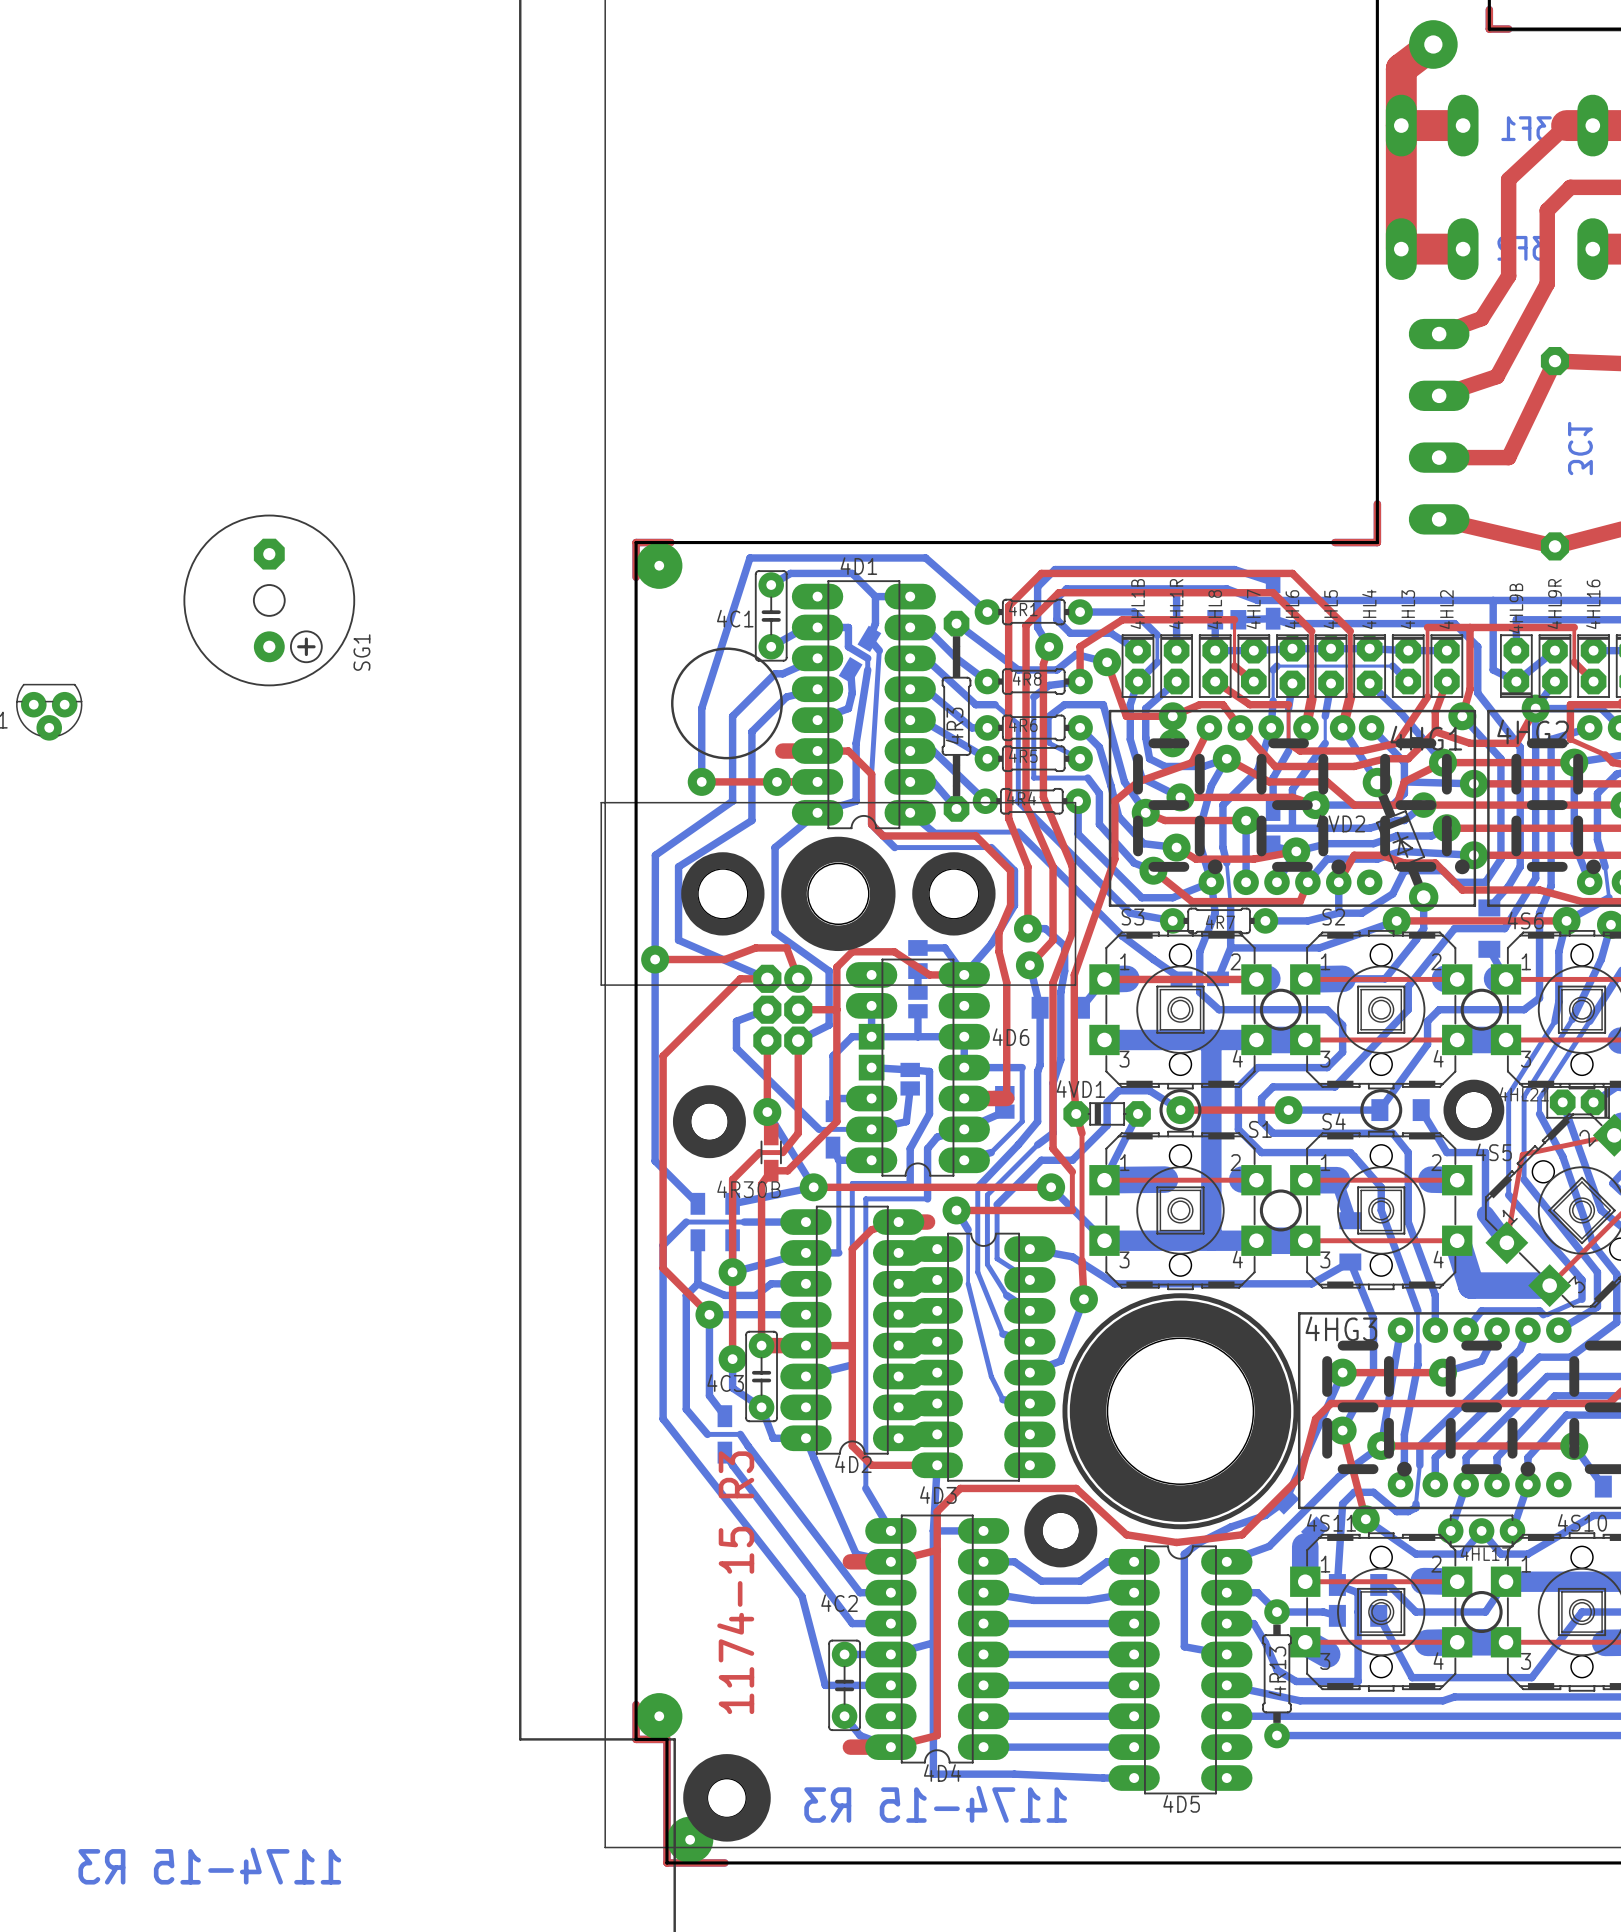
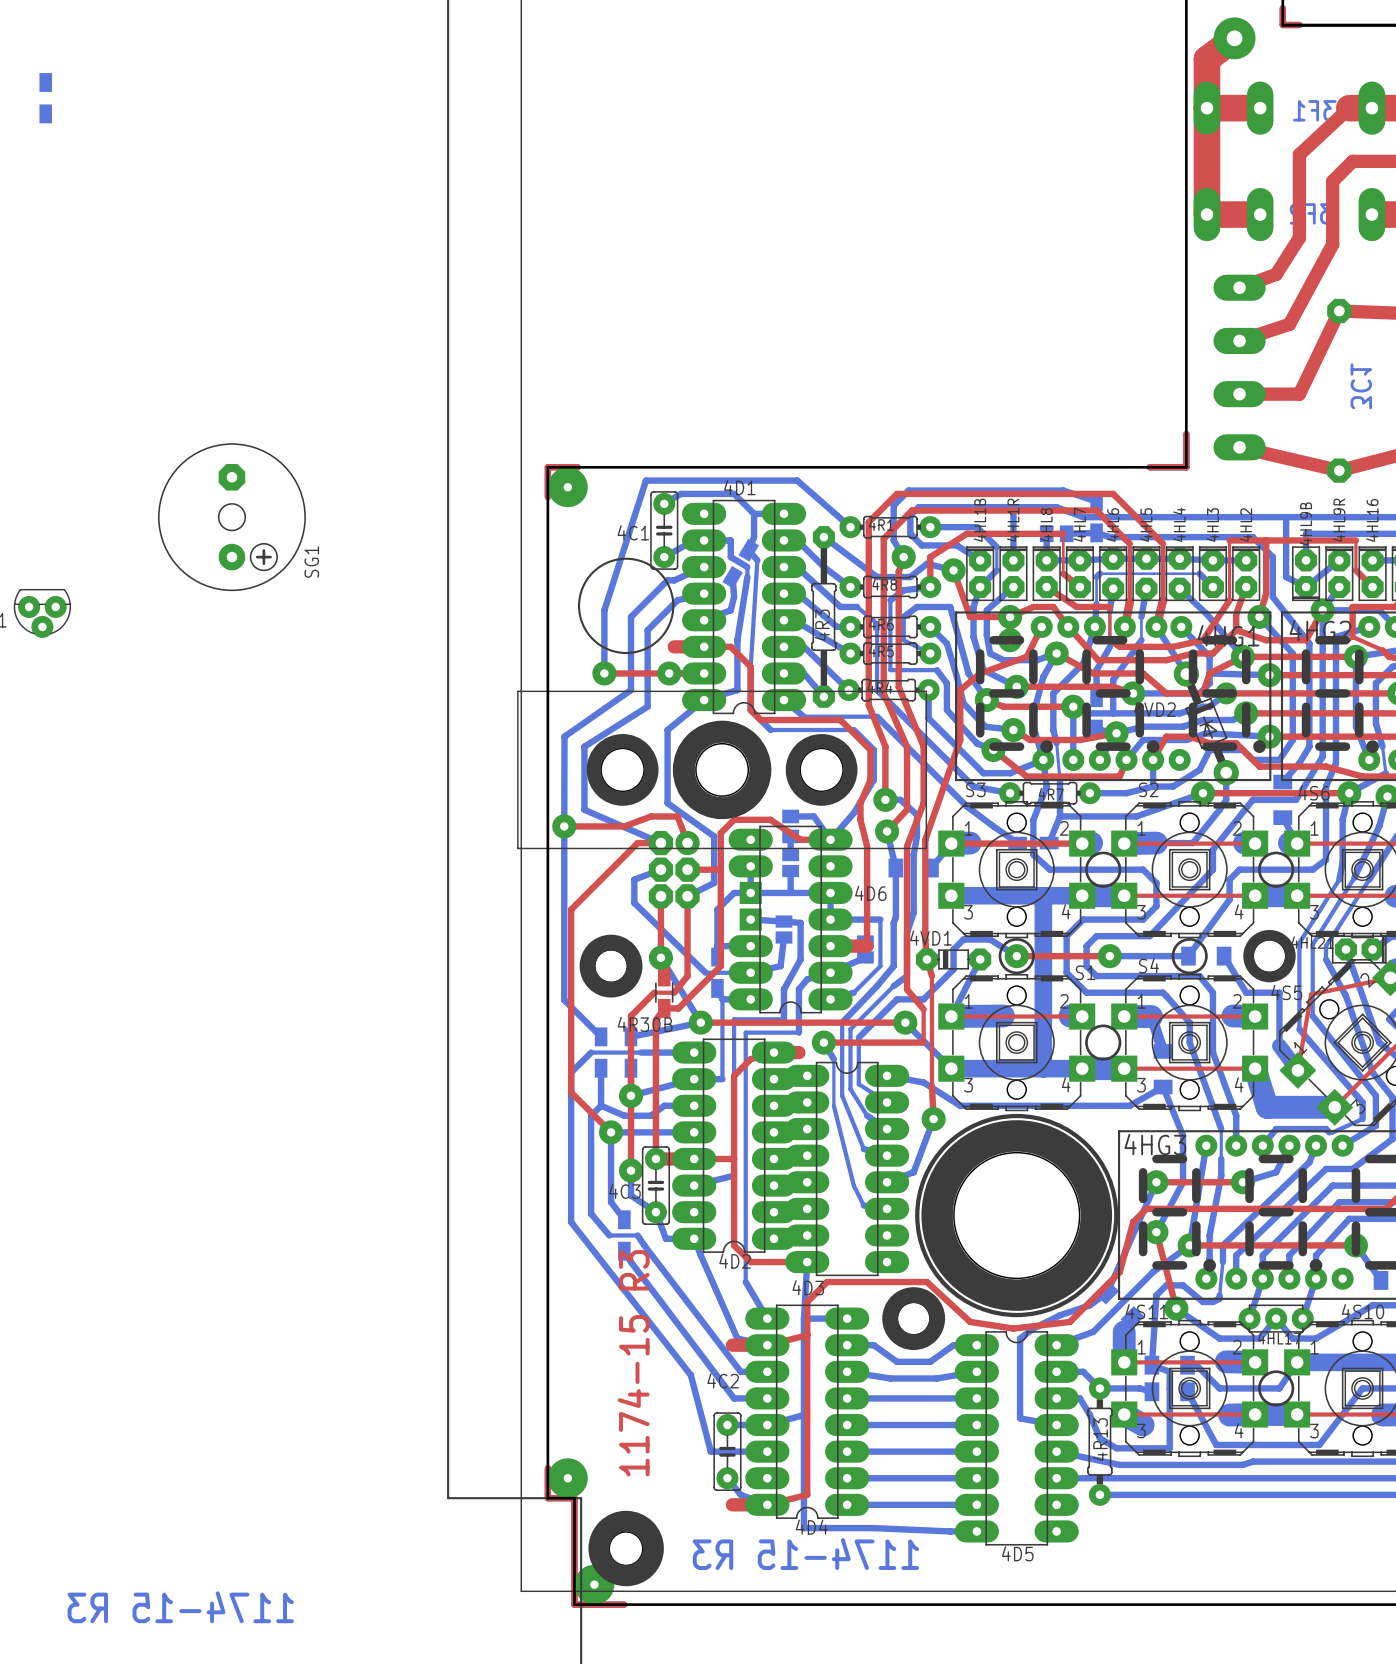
part: none -> (45, 98)

